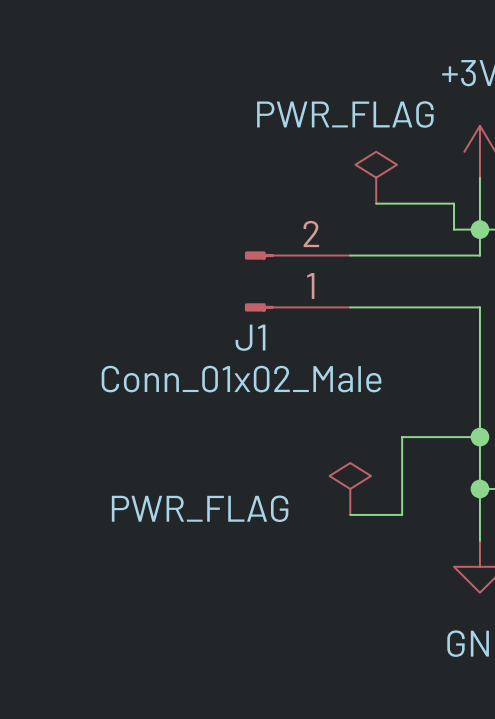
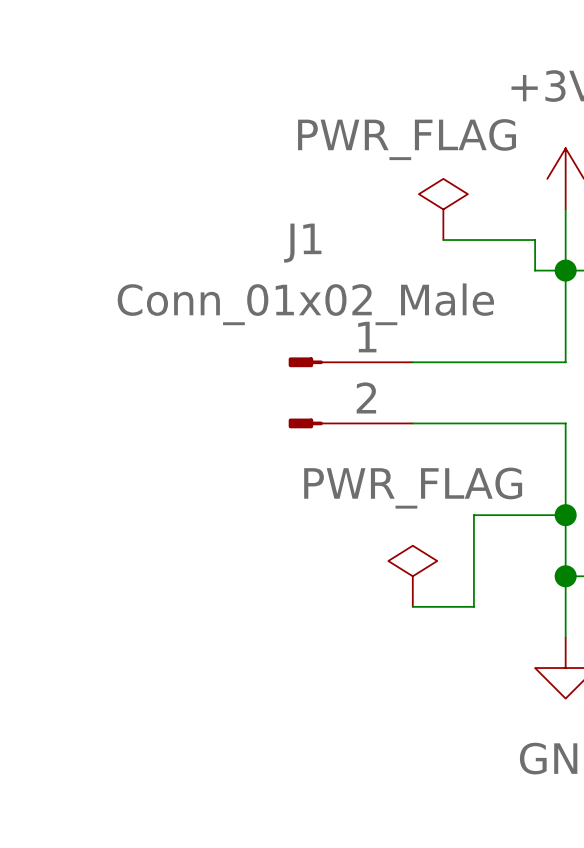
wire: (350, 255) (479, 255) -> (412, 423) (565, 423)
J1 flip: as is (259, 281) -> up-down (305, 392)
wire: (479, 307) (479, 359) -> (565, 362) (565, 301)
J1 name position: J1 (250, 337) -> J1 (302, 243)
power symbol text position: PWR_FLAG (200, 508) -> PWR_FLAG (413, 488)

